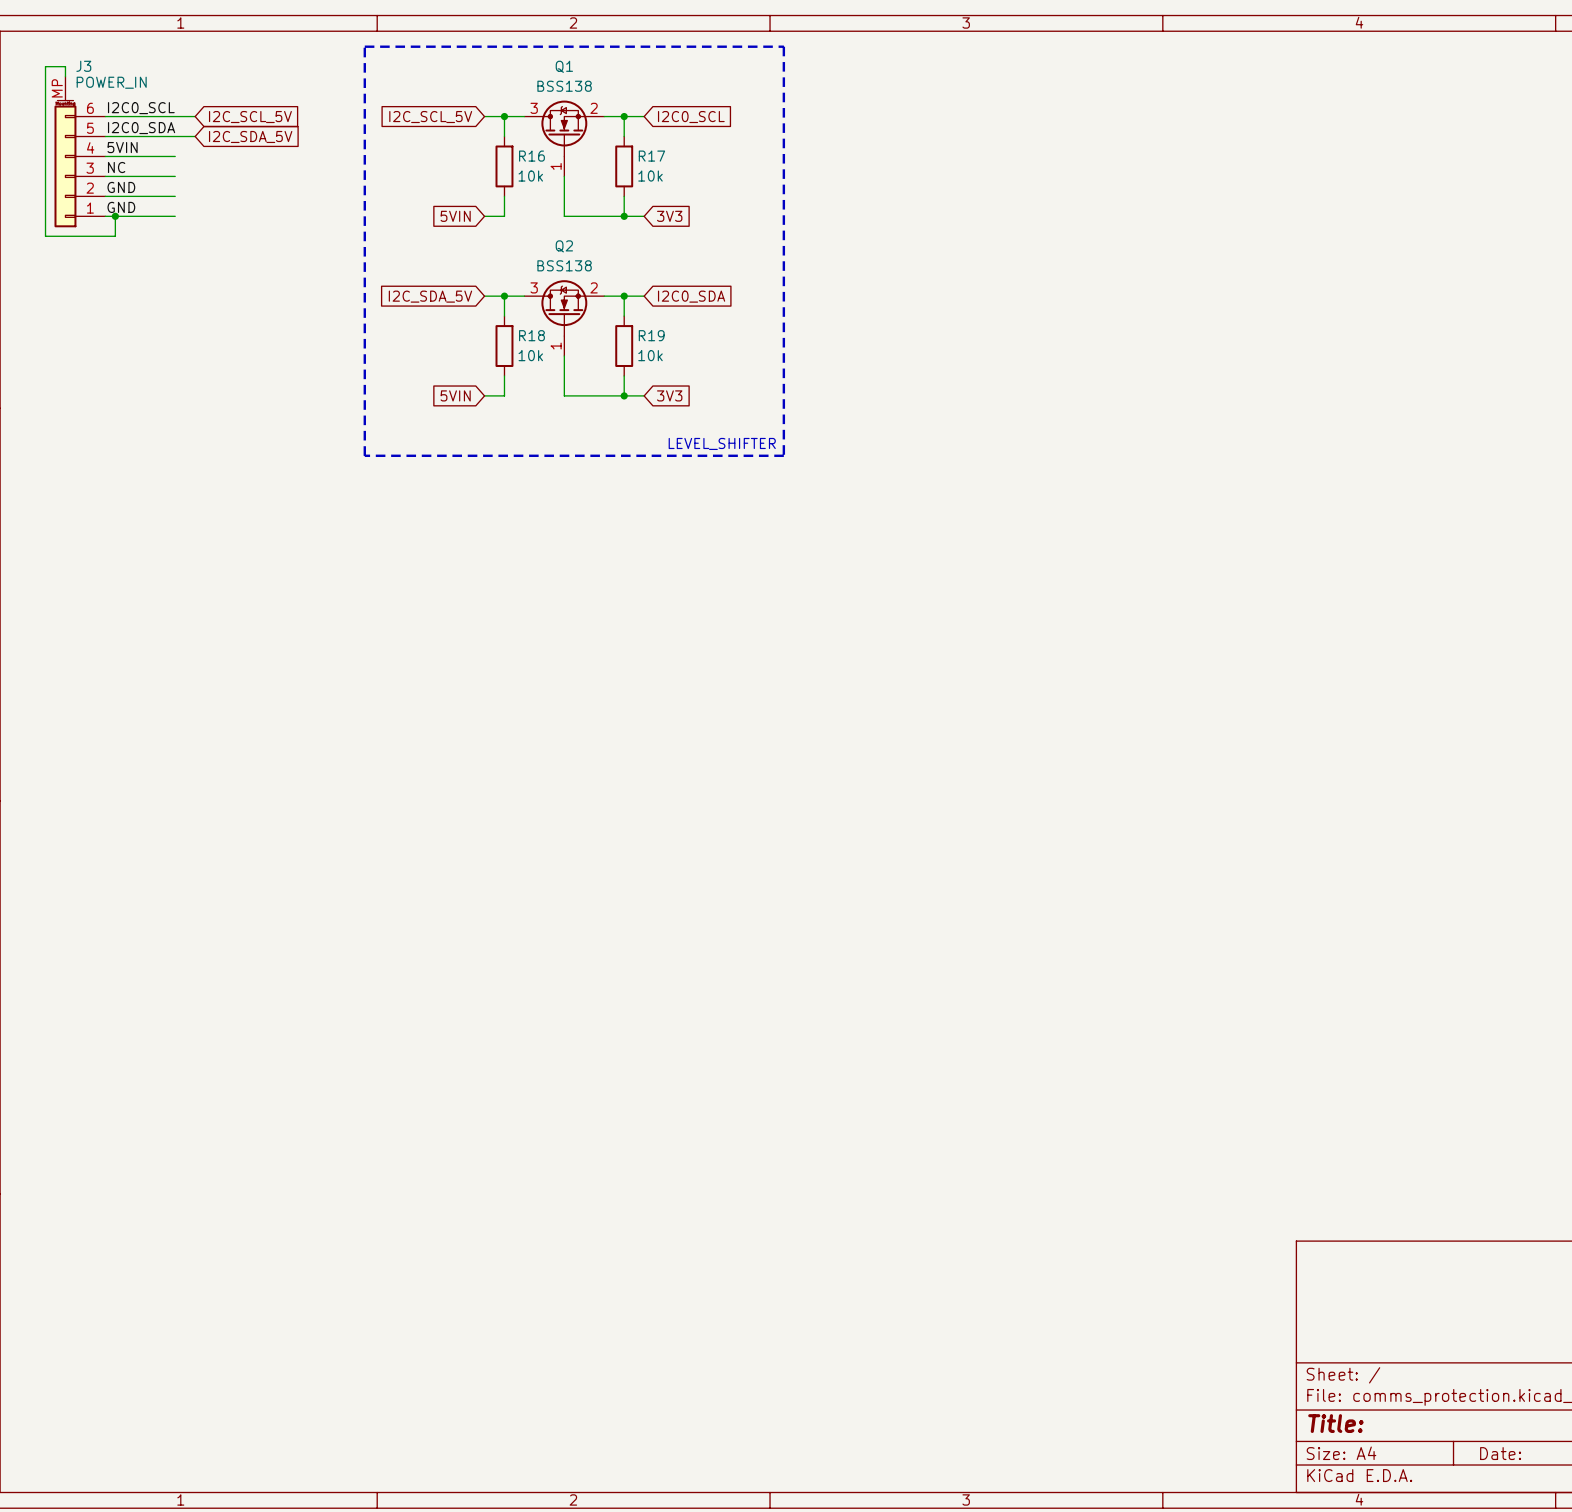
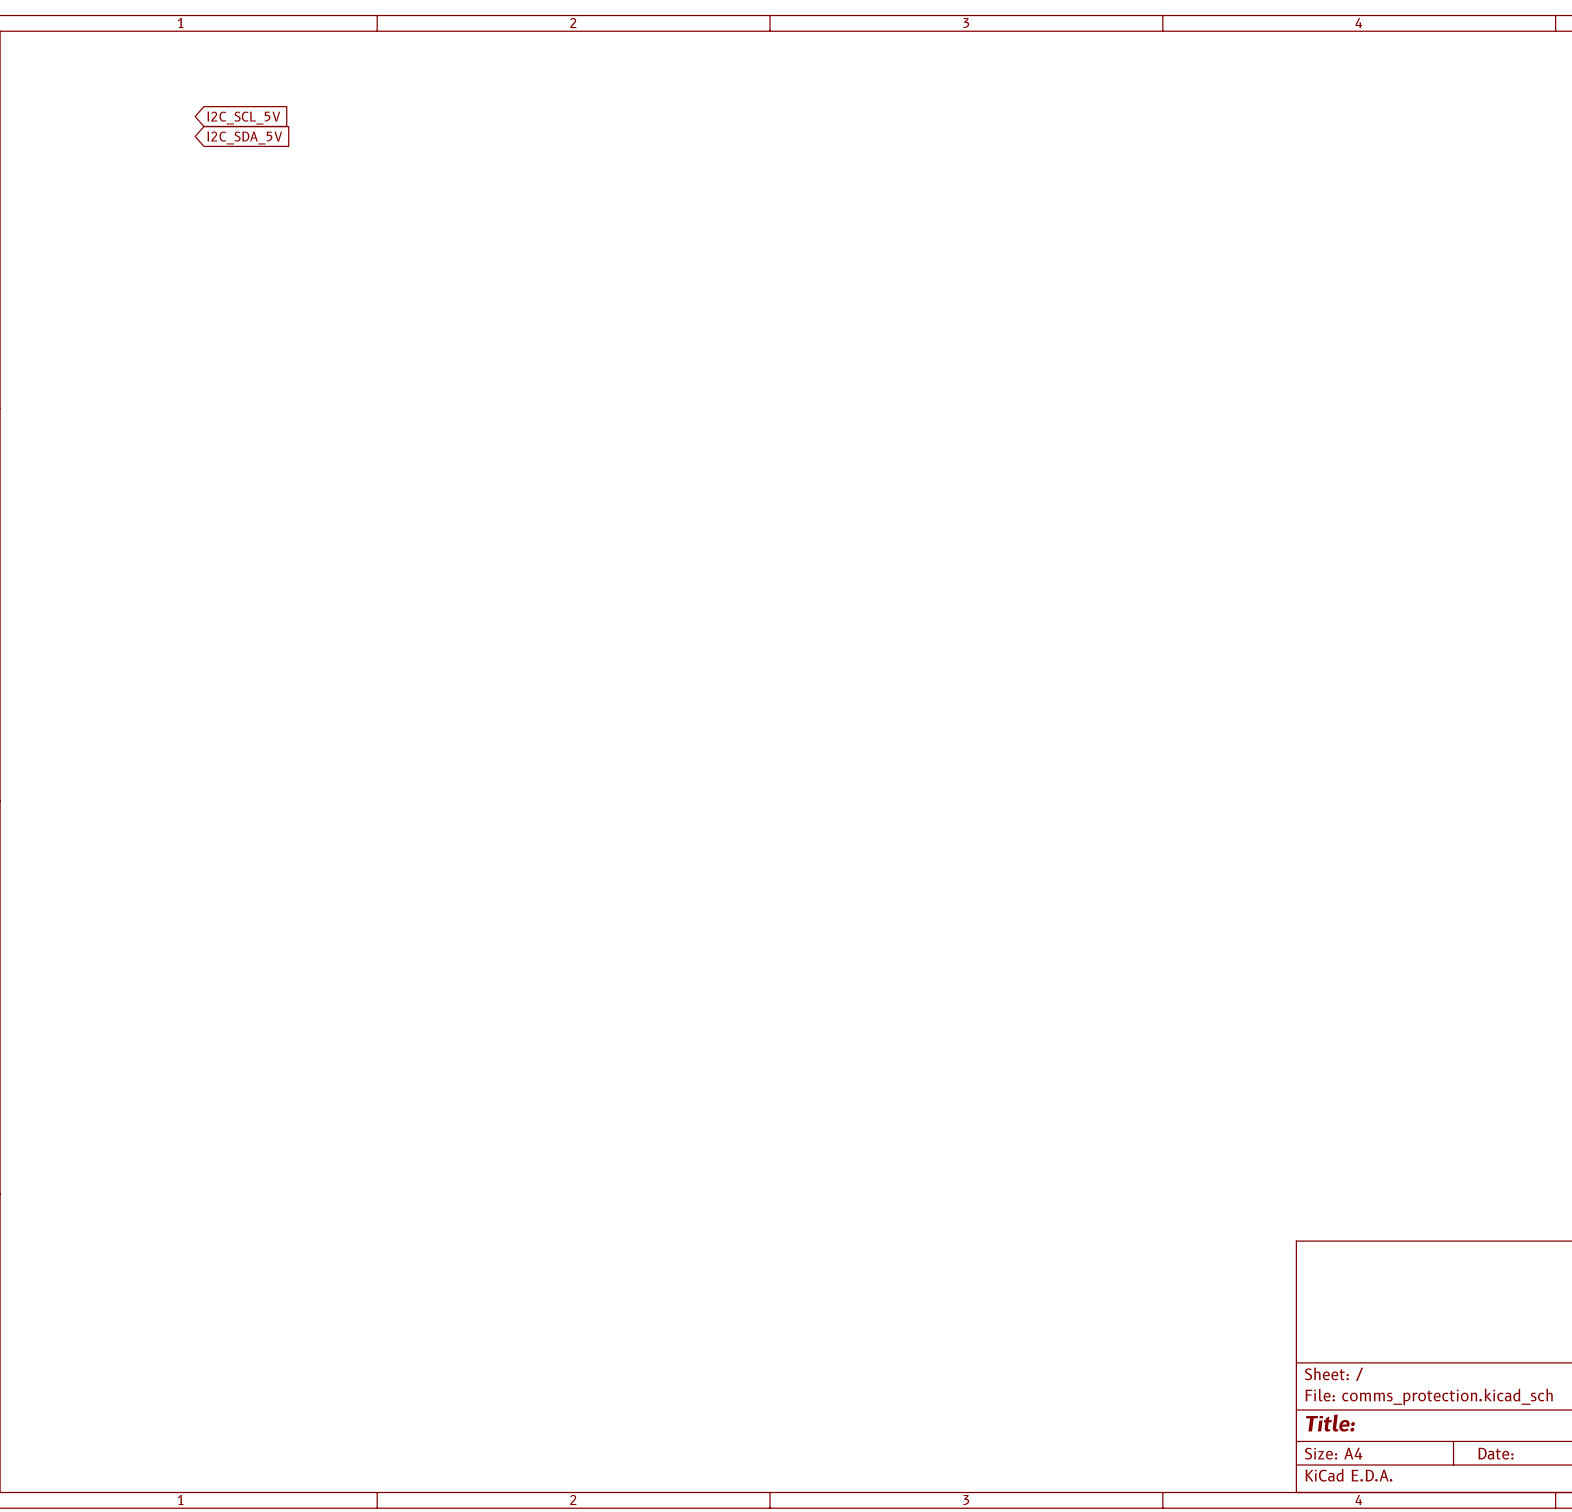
line: (364, 46) (783, 46) (783, 455) (364, 455) (364, 46) -> none
wire: (65, 76) (65, 66) (45, 66) (45, 236) (115, 236) (115, 216) -> none
label: I2C0_SCL (141, 108) -> none
wire: (105, 116) (195, 116) -> none
wire: (484, 116) (524, 116) -> none
wire: (504, 116) (504, 136) -> none
junction: (504, 116) -> none
wire: (604, 116) (644, 116) -> none
wire: (624, 116) (624, 136) -> none
junction: (624, 116) -> none
global label: I2C_SCL_5V (430, 117) -> none
global label: I2C0_SCL (691, 117) -> none
label: I2C0_SDA (141, 128) -> none
wire: (105, 136) (195, 136) -> none
Q1: BSS138 (564, 138) -> none
label: 5VIN (122, 147) -> none
J3: POWER_IN (79, 151) -> none
wire: (105, 156) (175, 156) -> none
R16: 10k (504, 166) -> none
R17: 10k (624, 166) -> none
label: NC (116, 167) -> none
wire: (105, 176) (175, 176) -> none
wire: (564, 176) (564, 216) (644, 216) -> none
label: GND (121, 187) -> none
wire: (105, 196) (175, 196) -> none
wire: (504, 196) (504, 216) (484, 216) -> none
wire: (624, 196) (624, 216) -> none
label: GND (121, 207) -> none
wire: (105, 216) (175, 216) -> none
junction: (115, 216) -> none
global label: 5VIN (455, 216) -> none
junction: (624, 216) -> none
global label: 3V3 (669, 216) -> none
global label: I2C_SDA_5V (430, 296) -> none
wire: (484, 296) (524, 296) -> none
wire: (504, 296) (504, 316) -> none
junction: (504, 296) -> none
wire: (604, 296) (644, 296) -> none
wire: (624, 296) (624, 316) -> none
junction: (624, 296) -> none
global label: I2C0_SDA (691, 296) -> none
Q2: BSS138 (564, 318) -> none
R18: 10k (504, 346) -> none
R19: 10k (624, 346) -> none
wire: (564, 356) (564, 395) (644, 395) -> none
wire: (504, 375) (504, 395) (484, 395) -> none
wire: (624, 375) (624, 395) -> none
global label: 5VIN (455, 395) -> none
junction: (624, 395) -> none
global label: 3V3 (669, 395) -> none
text: LEVEL_SHIFTER (722, 443) -> none

